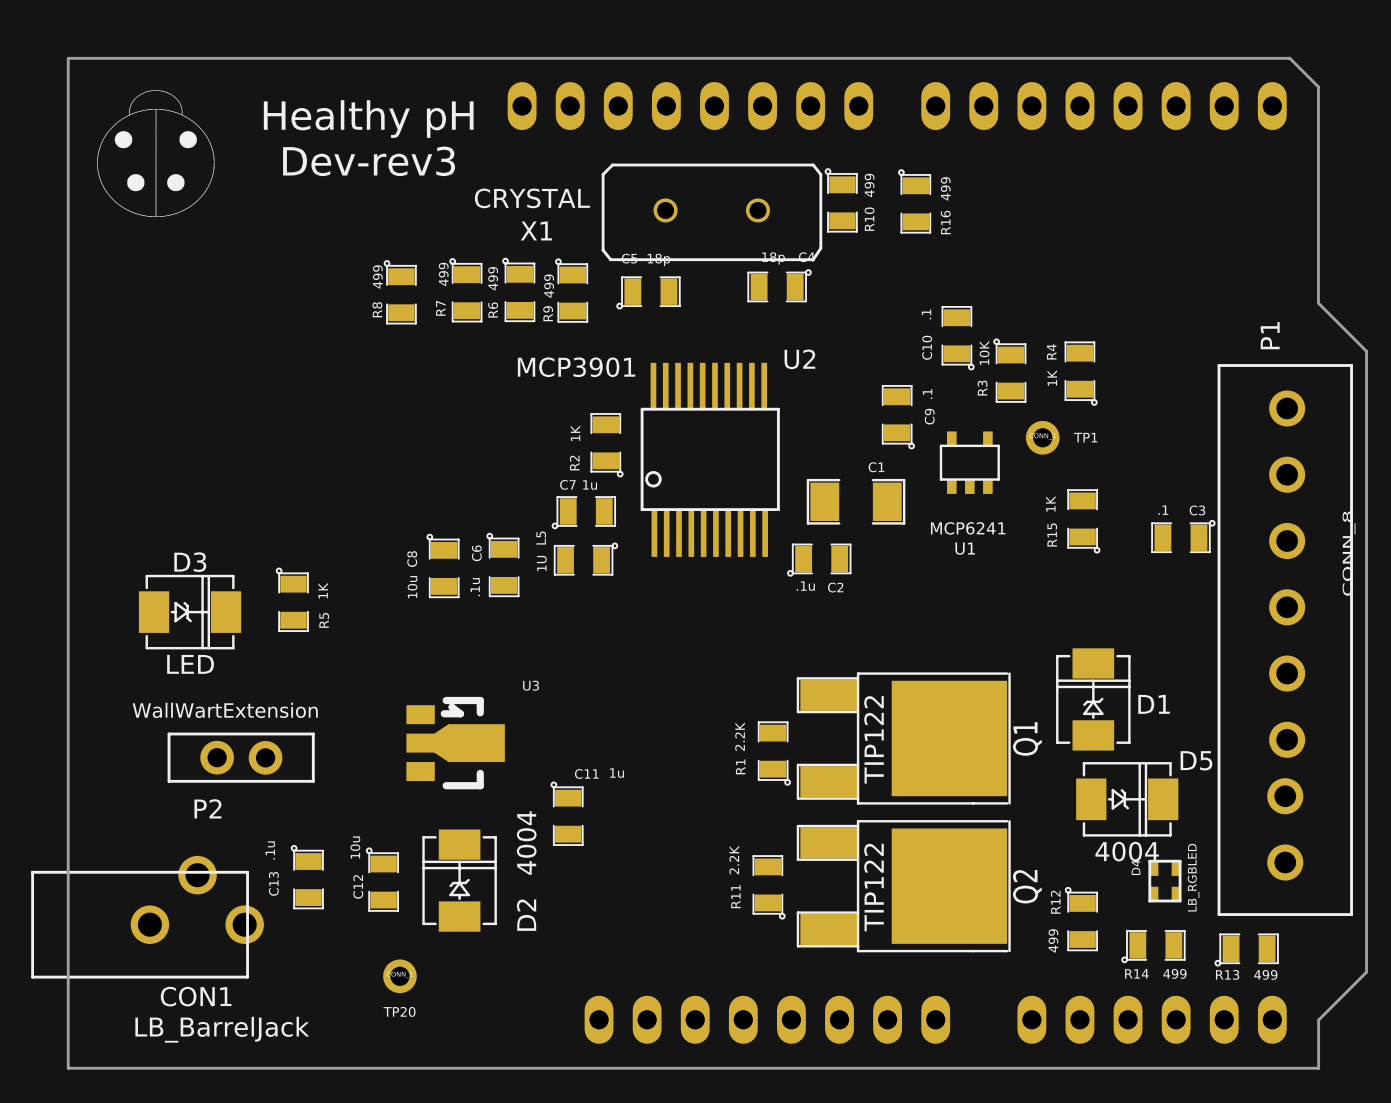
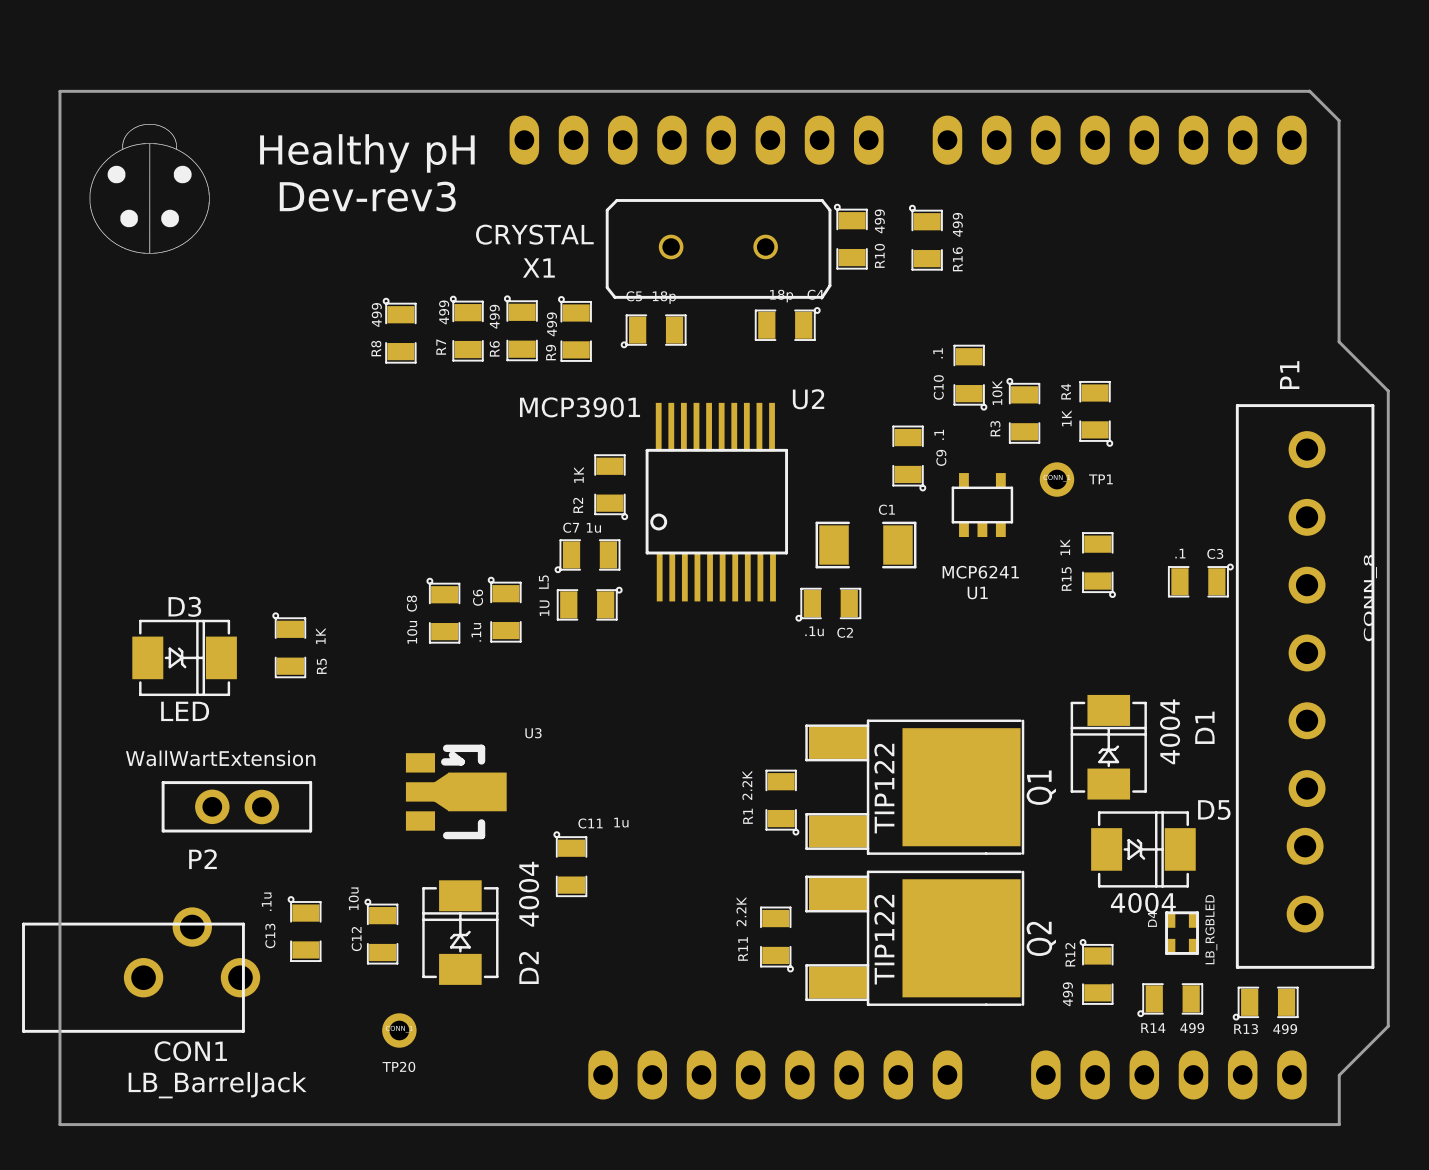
D1 value: none -> 4004 (1170, 731)
D1 name rotation: 0° (1154, 704) -> 90° counterclockwise (1204, 727)

